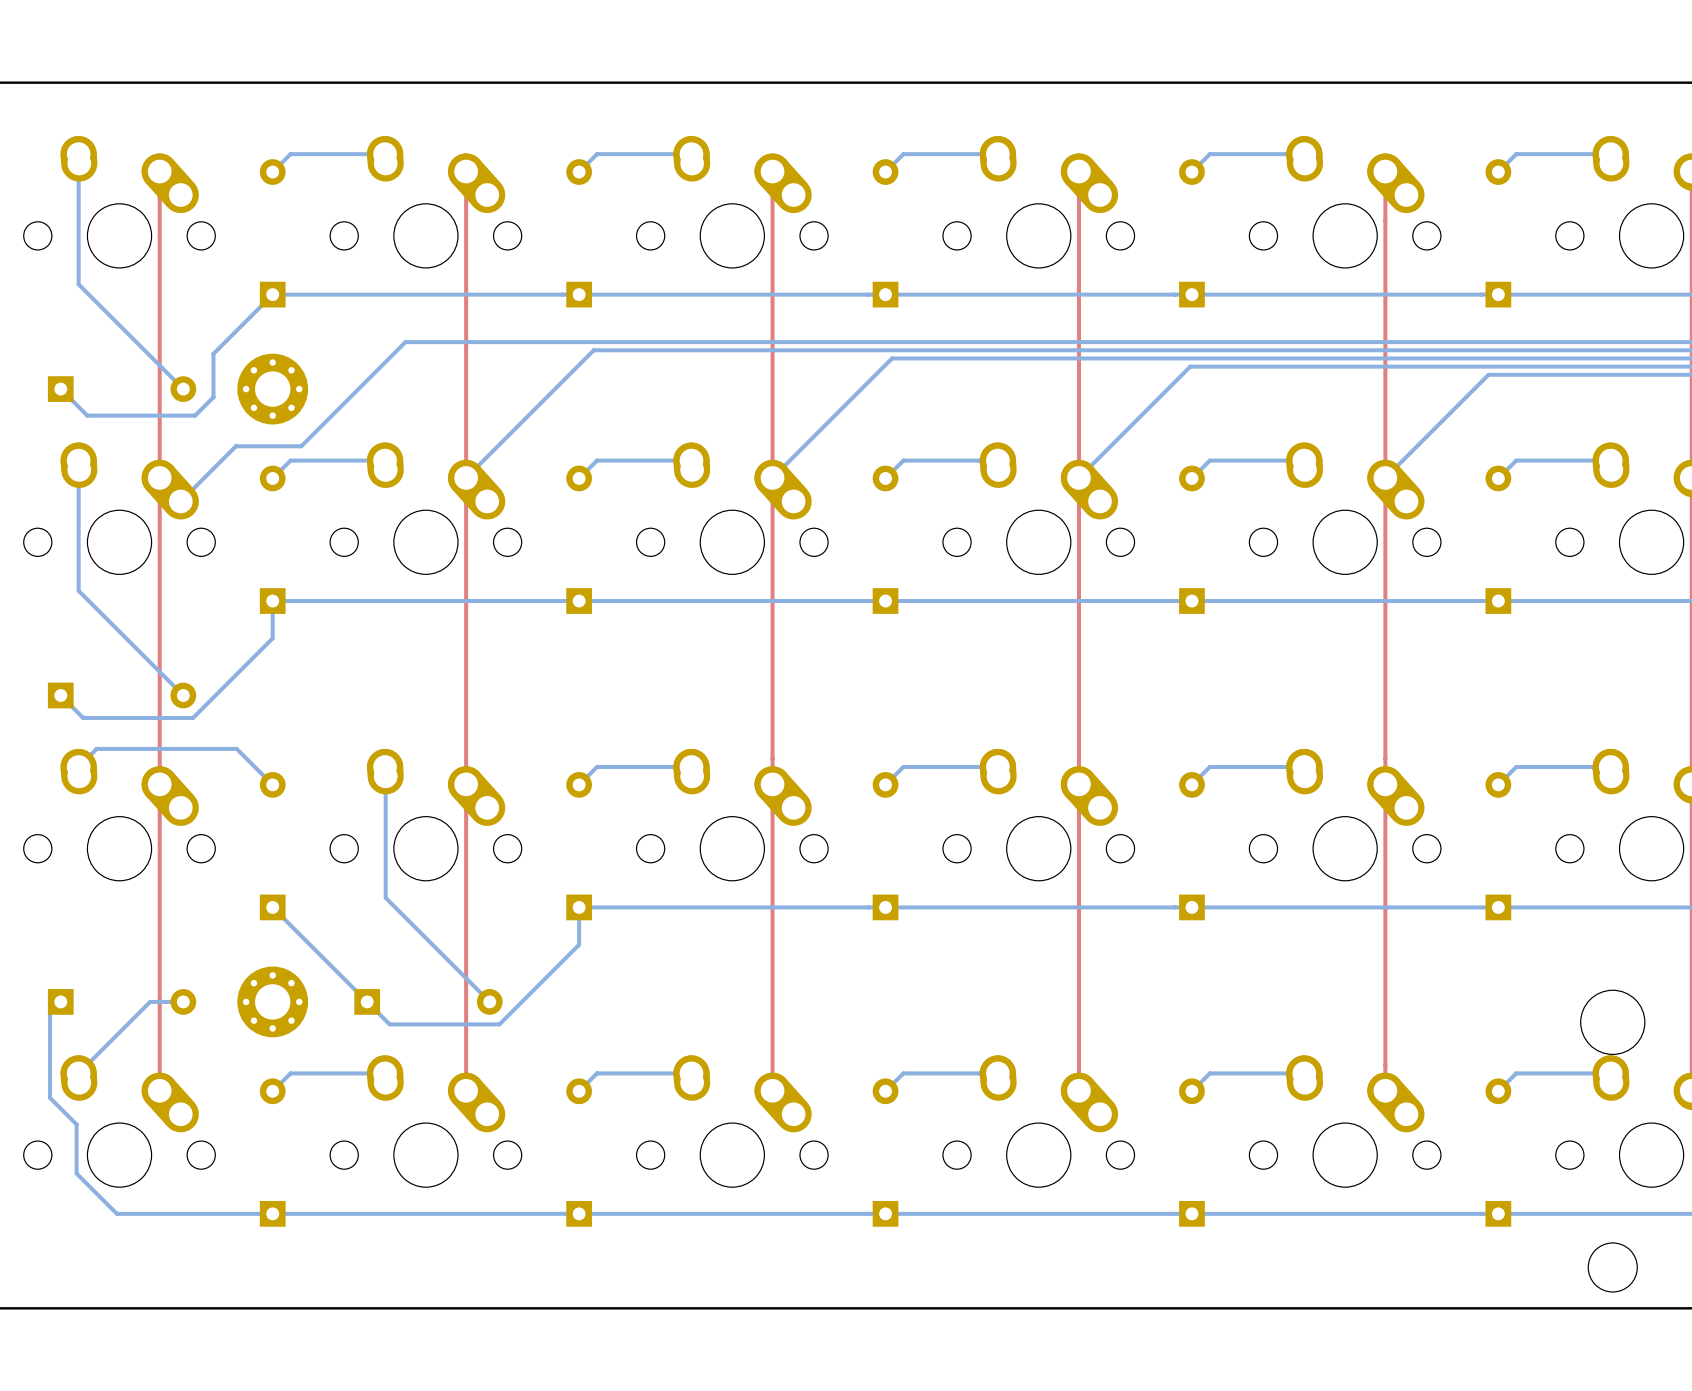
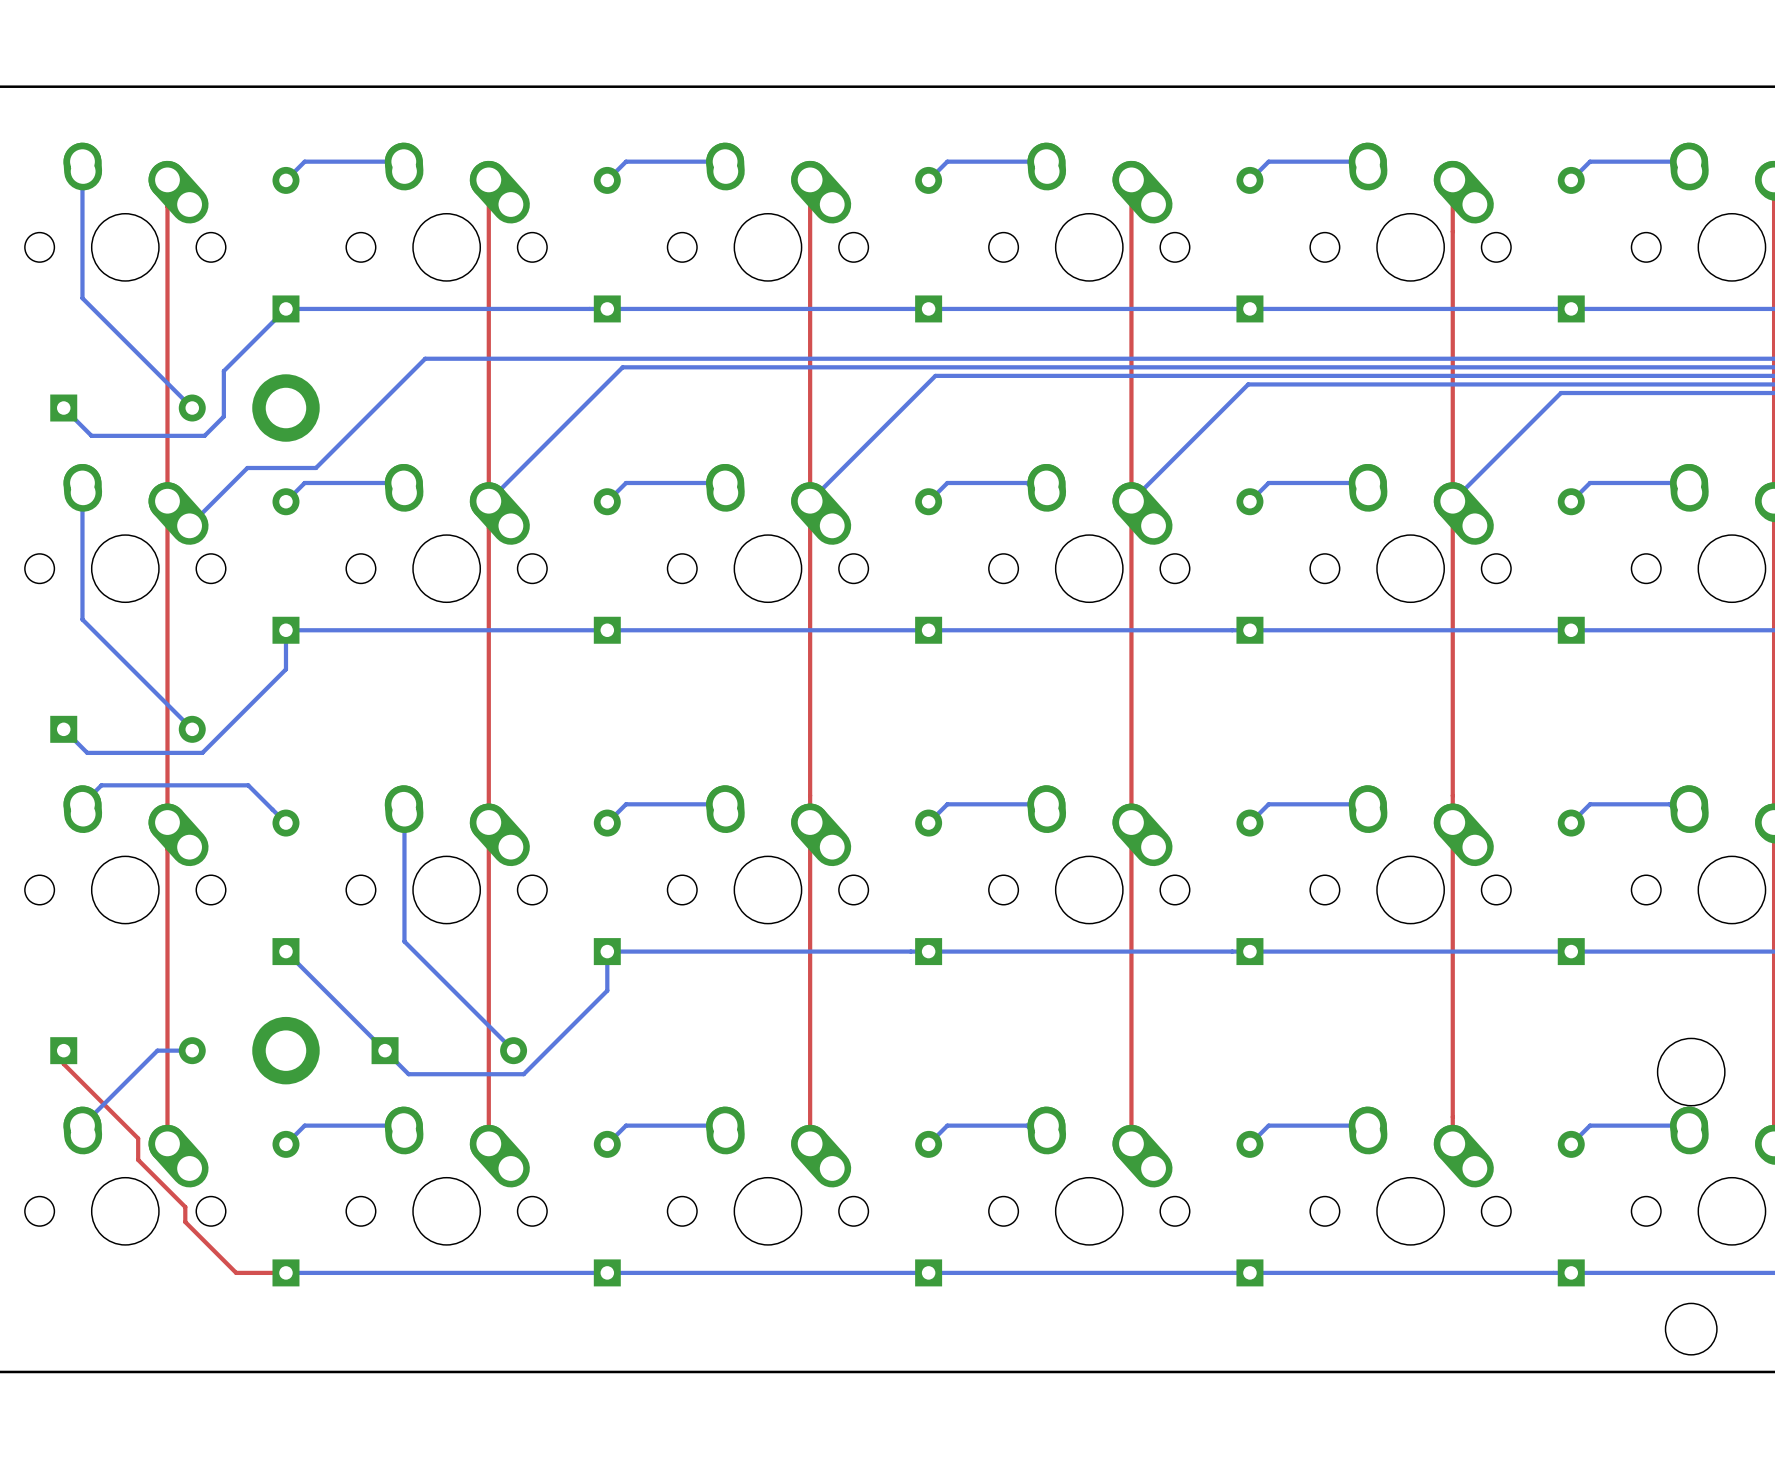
part footprint: [237, 353, 309, 425] -> [252, 374, 320, 442]
part footprint: [237, 966, 309, 1038] -> [252, 1016, 320, 1085]
bottom track: (60, 1001) (50, 1012) (50, 1097) (76, 1124) (76, 1173) (116, 1213) (272, 1213) -> none
top track: none -> (63, 1050) (63, 1064) (138, 1138) (138, 1159) (185, 1207) (185, 1222) (236, 1272) (285, 1272)

